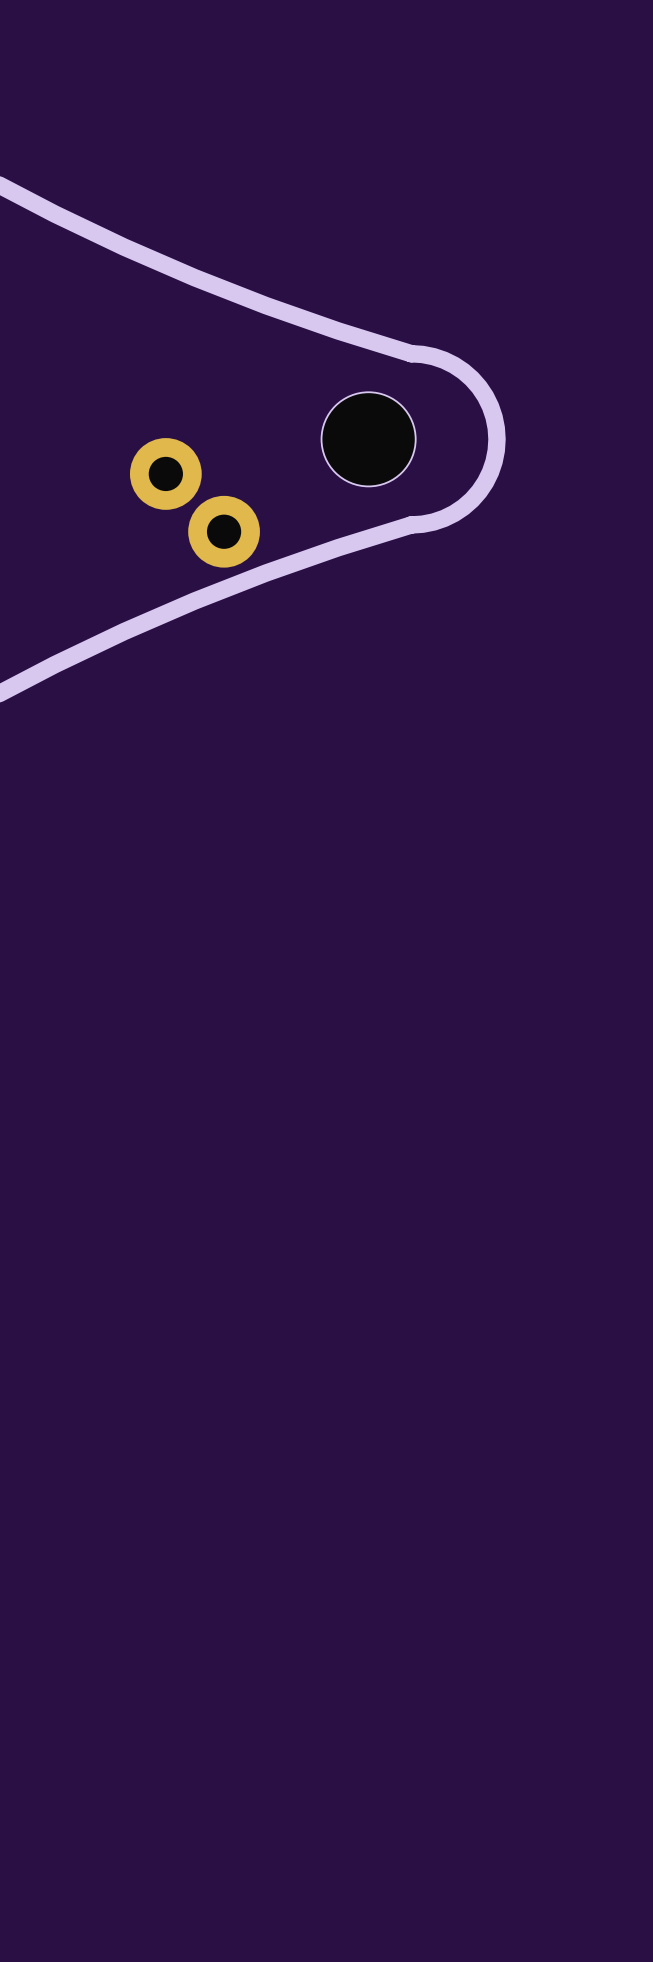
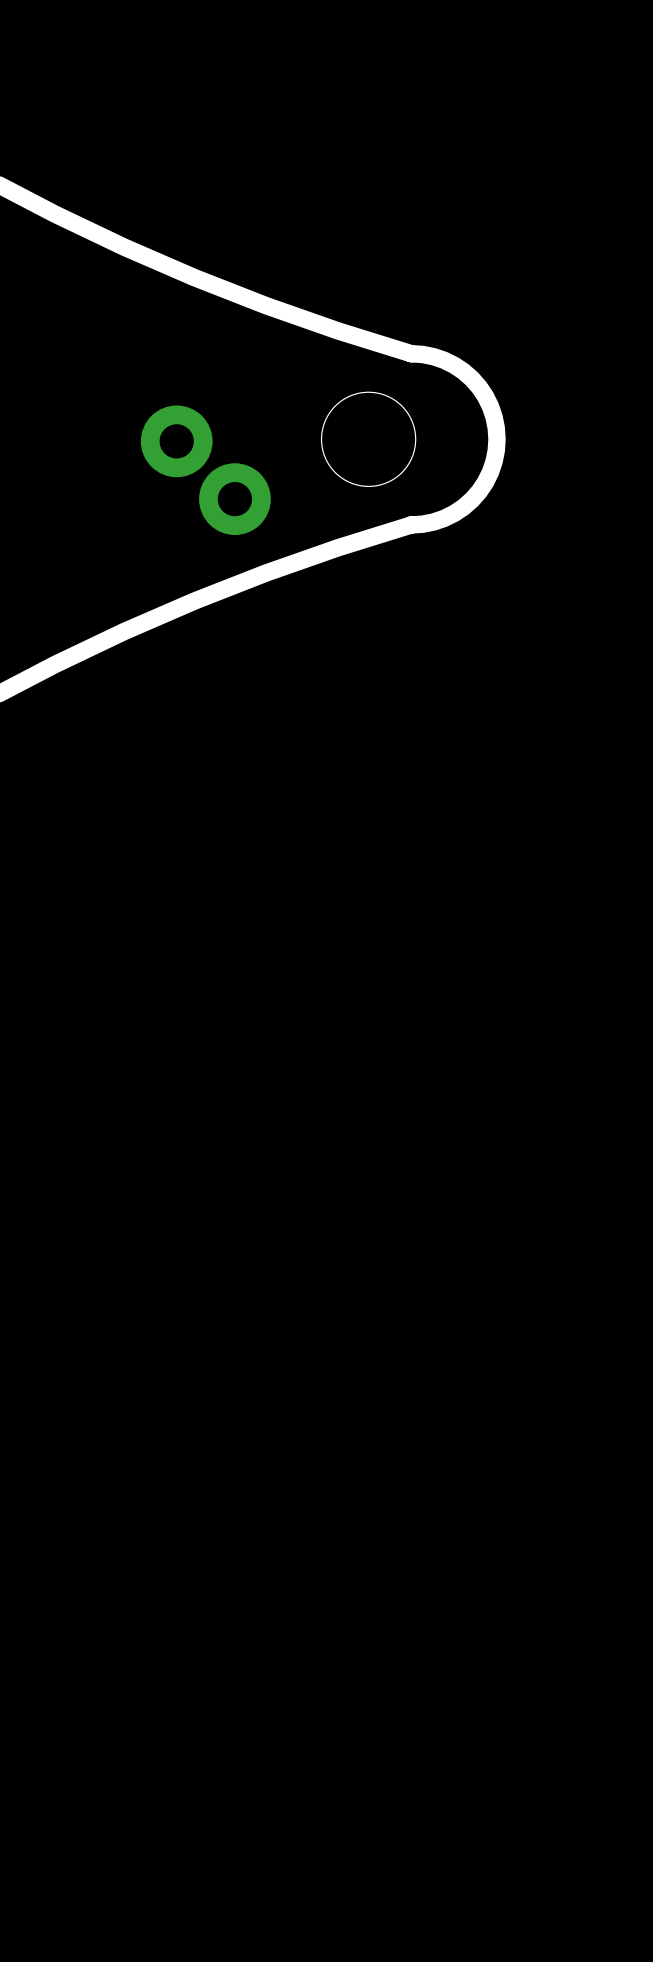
part position: (194, 502) -> (205, 470)

